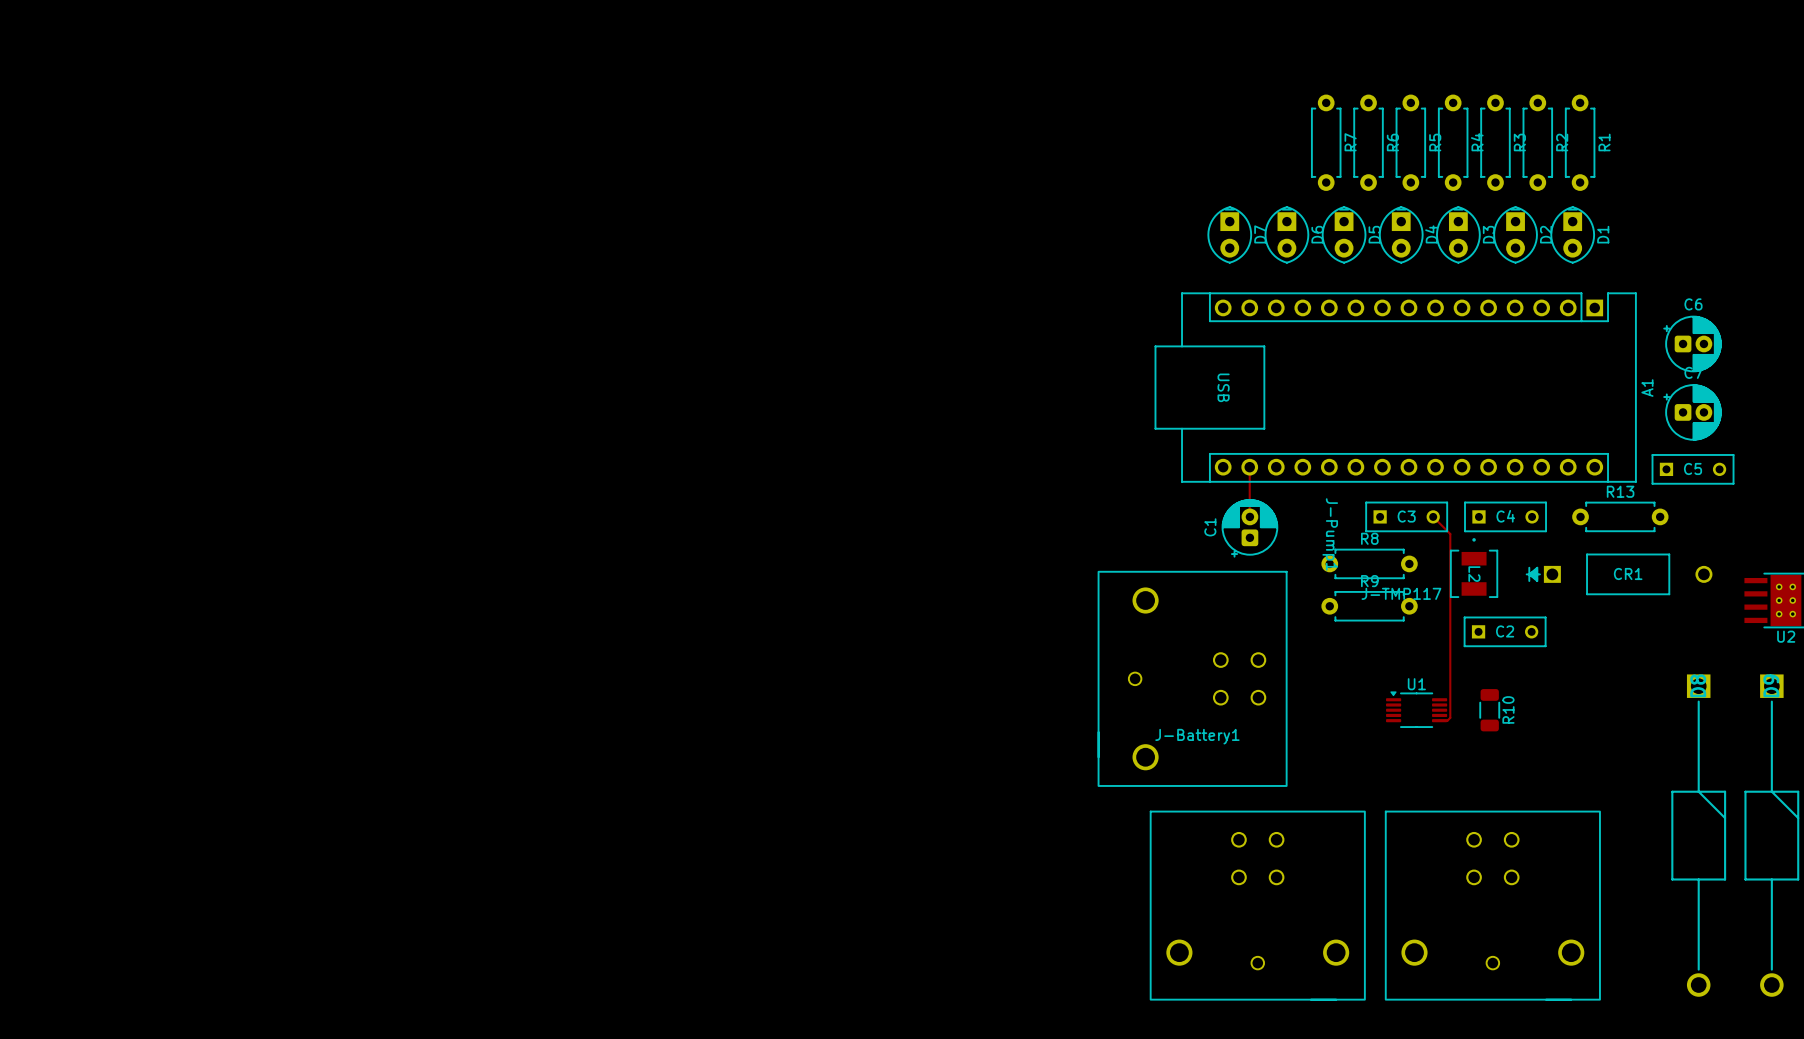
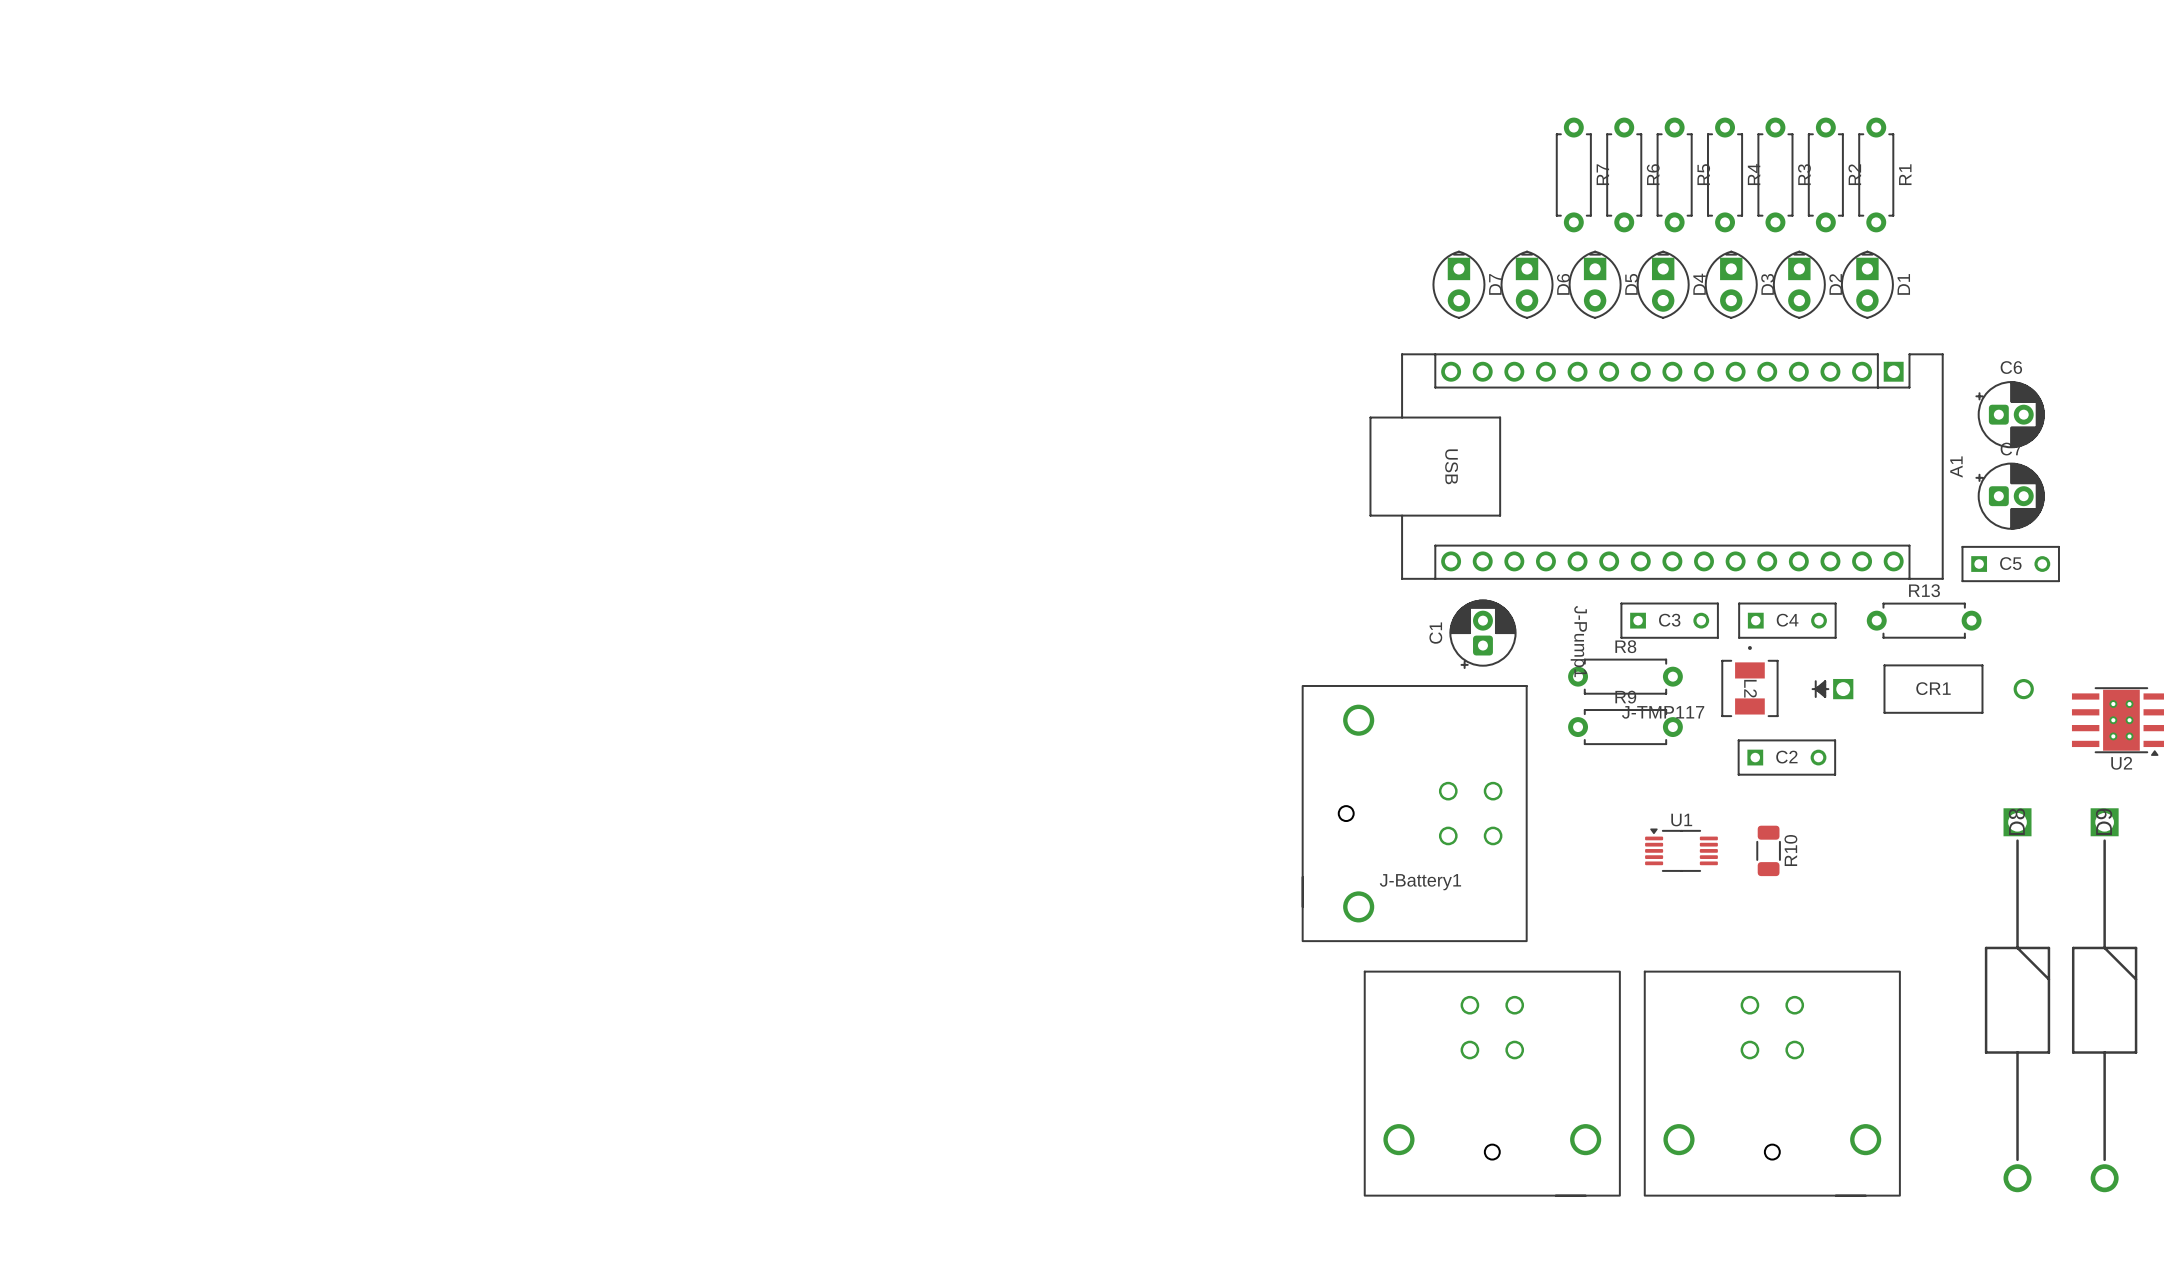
track: (1249, 467) (1249, 516) -> none
track: (1433, 516) (1450, 534) (1450, 717) (1447, 720) (1439, 720) -> none

